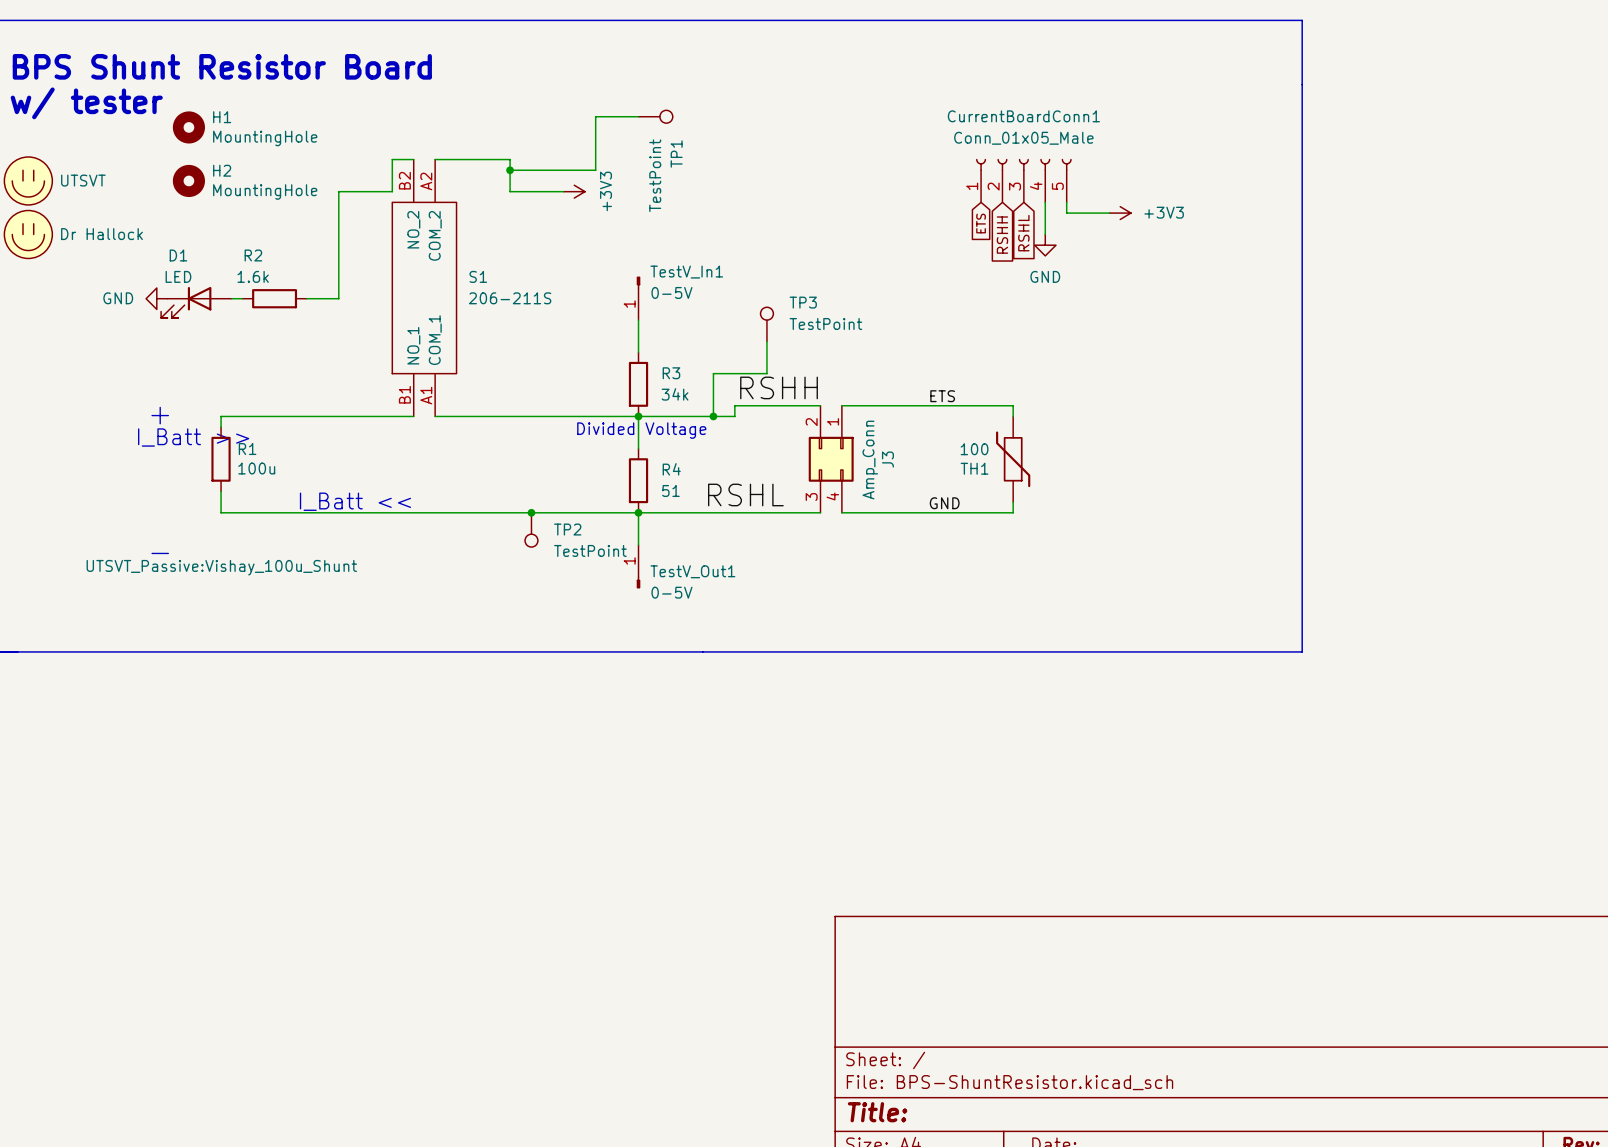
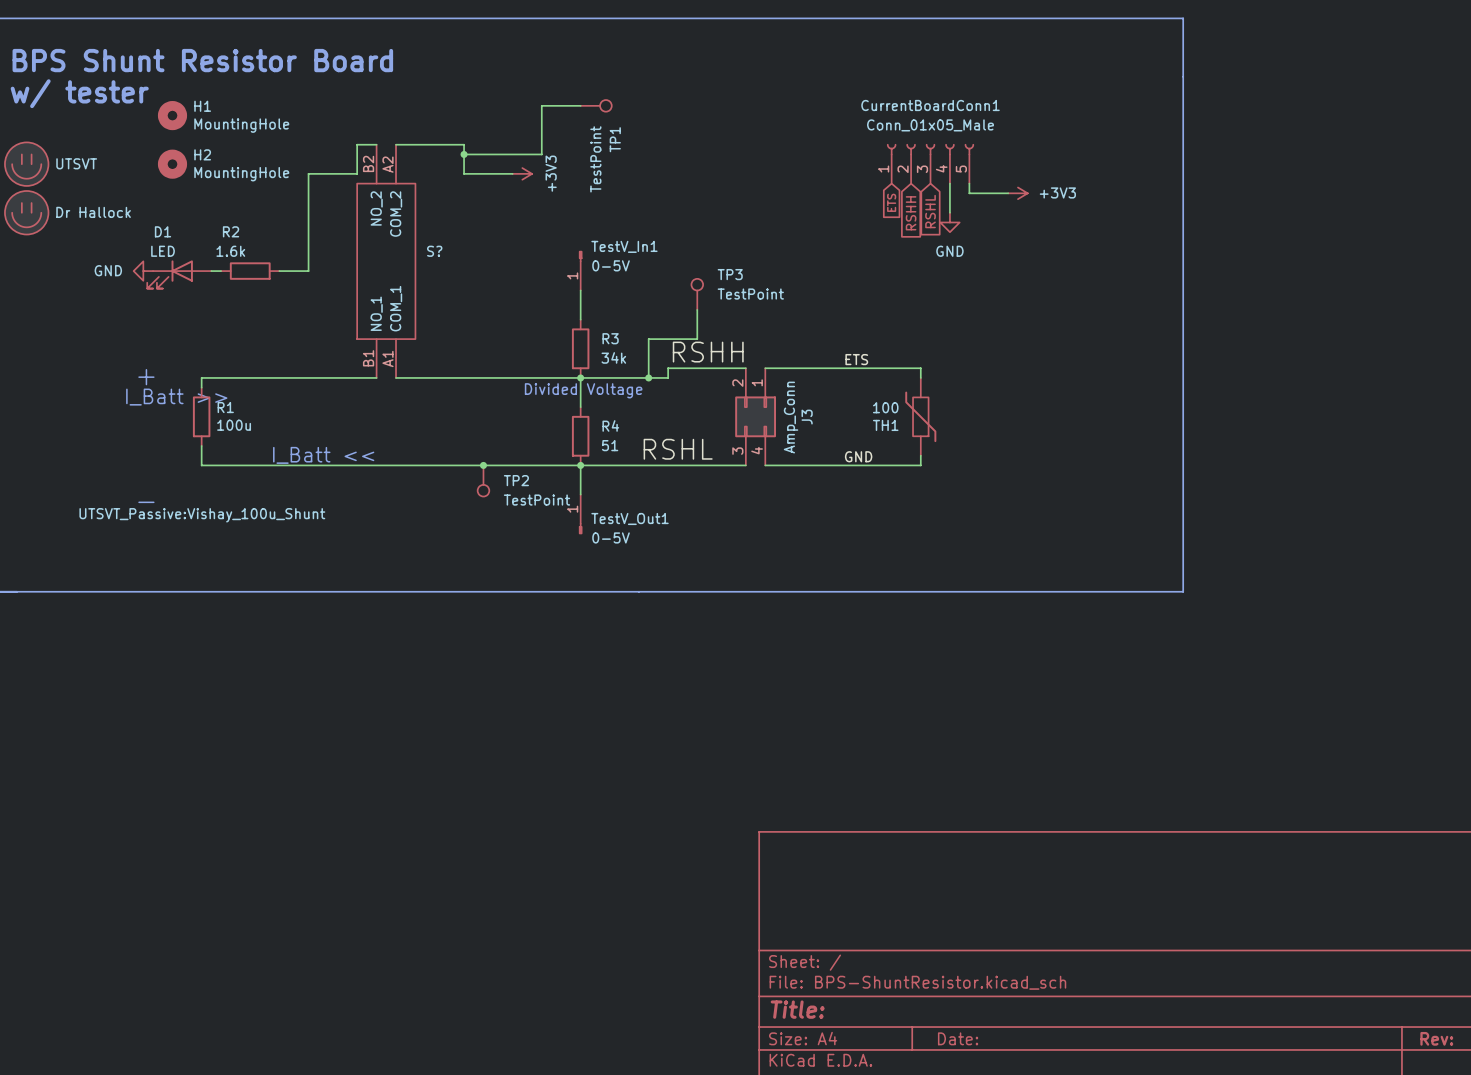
S1 name: S1 (478, 276) -> S? (434, 251)
S1 value: 206-211S (510, 298) -> none

